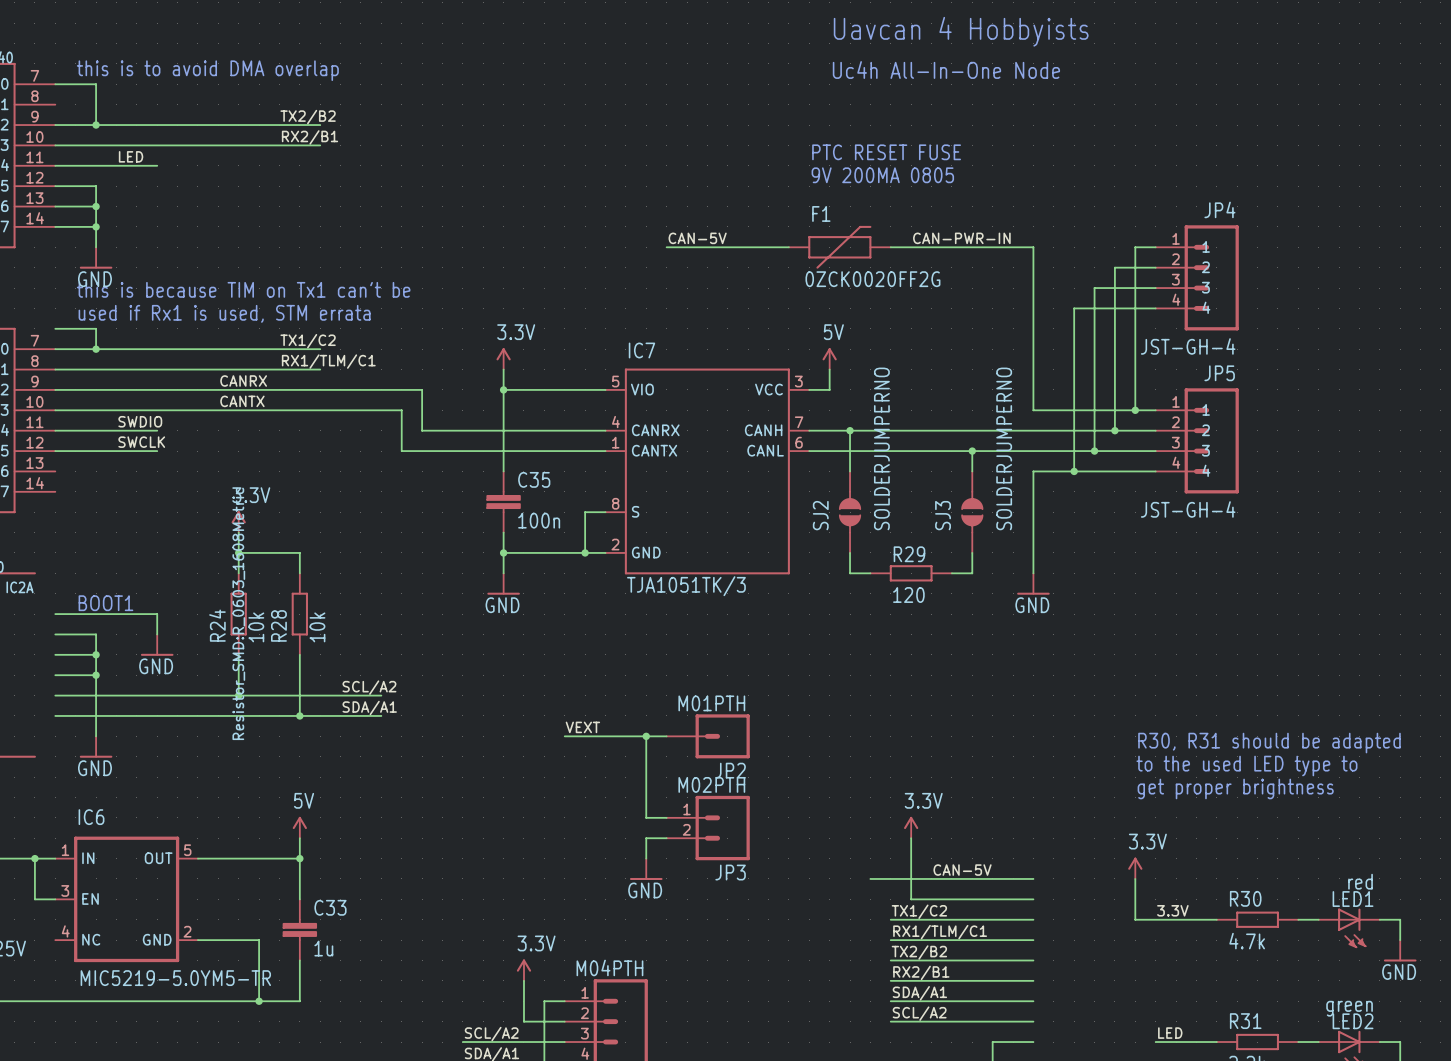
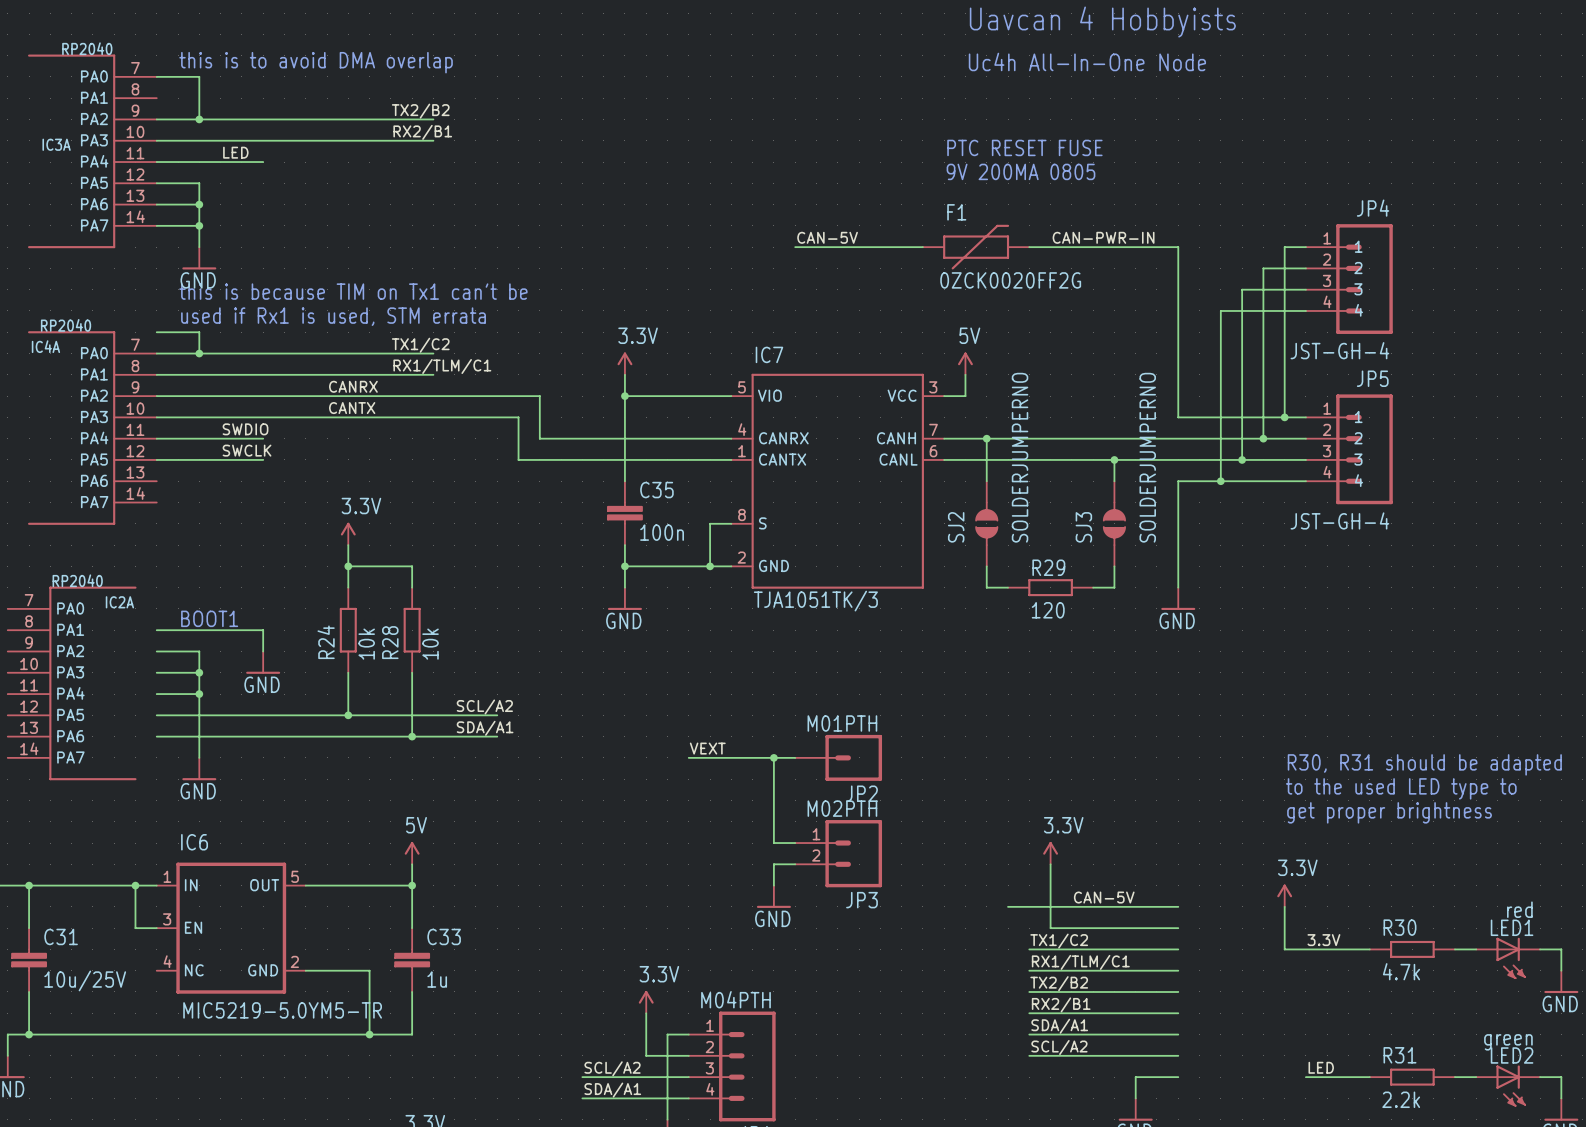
R24 text: Resistor_SMD:R_0603_1608Metric (238, 613) -> none

